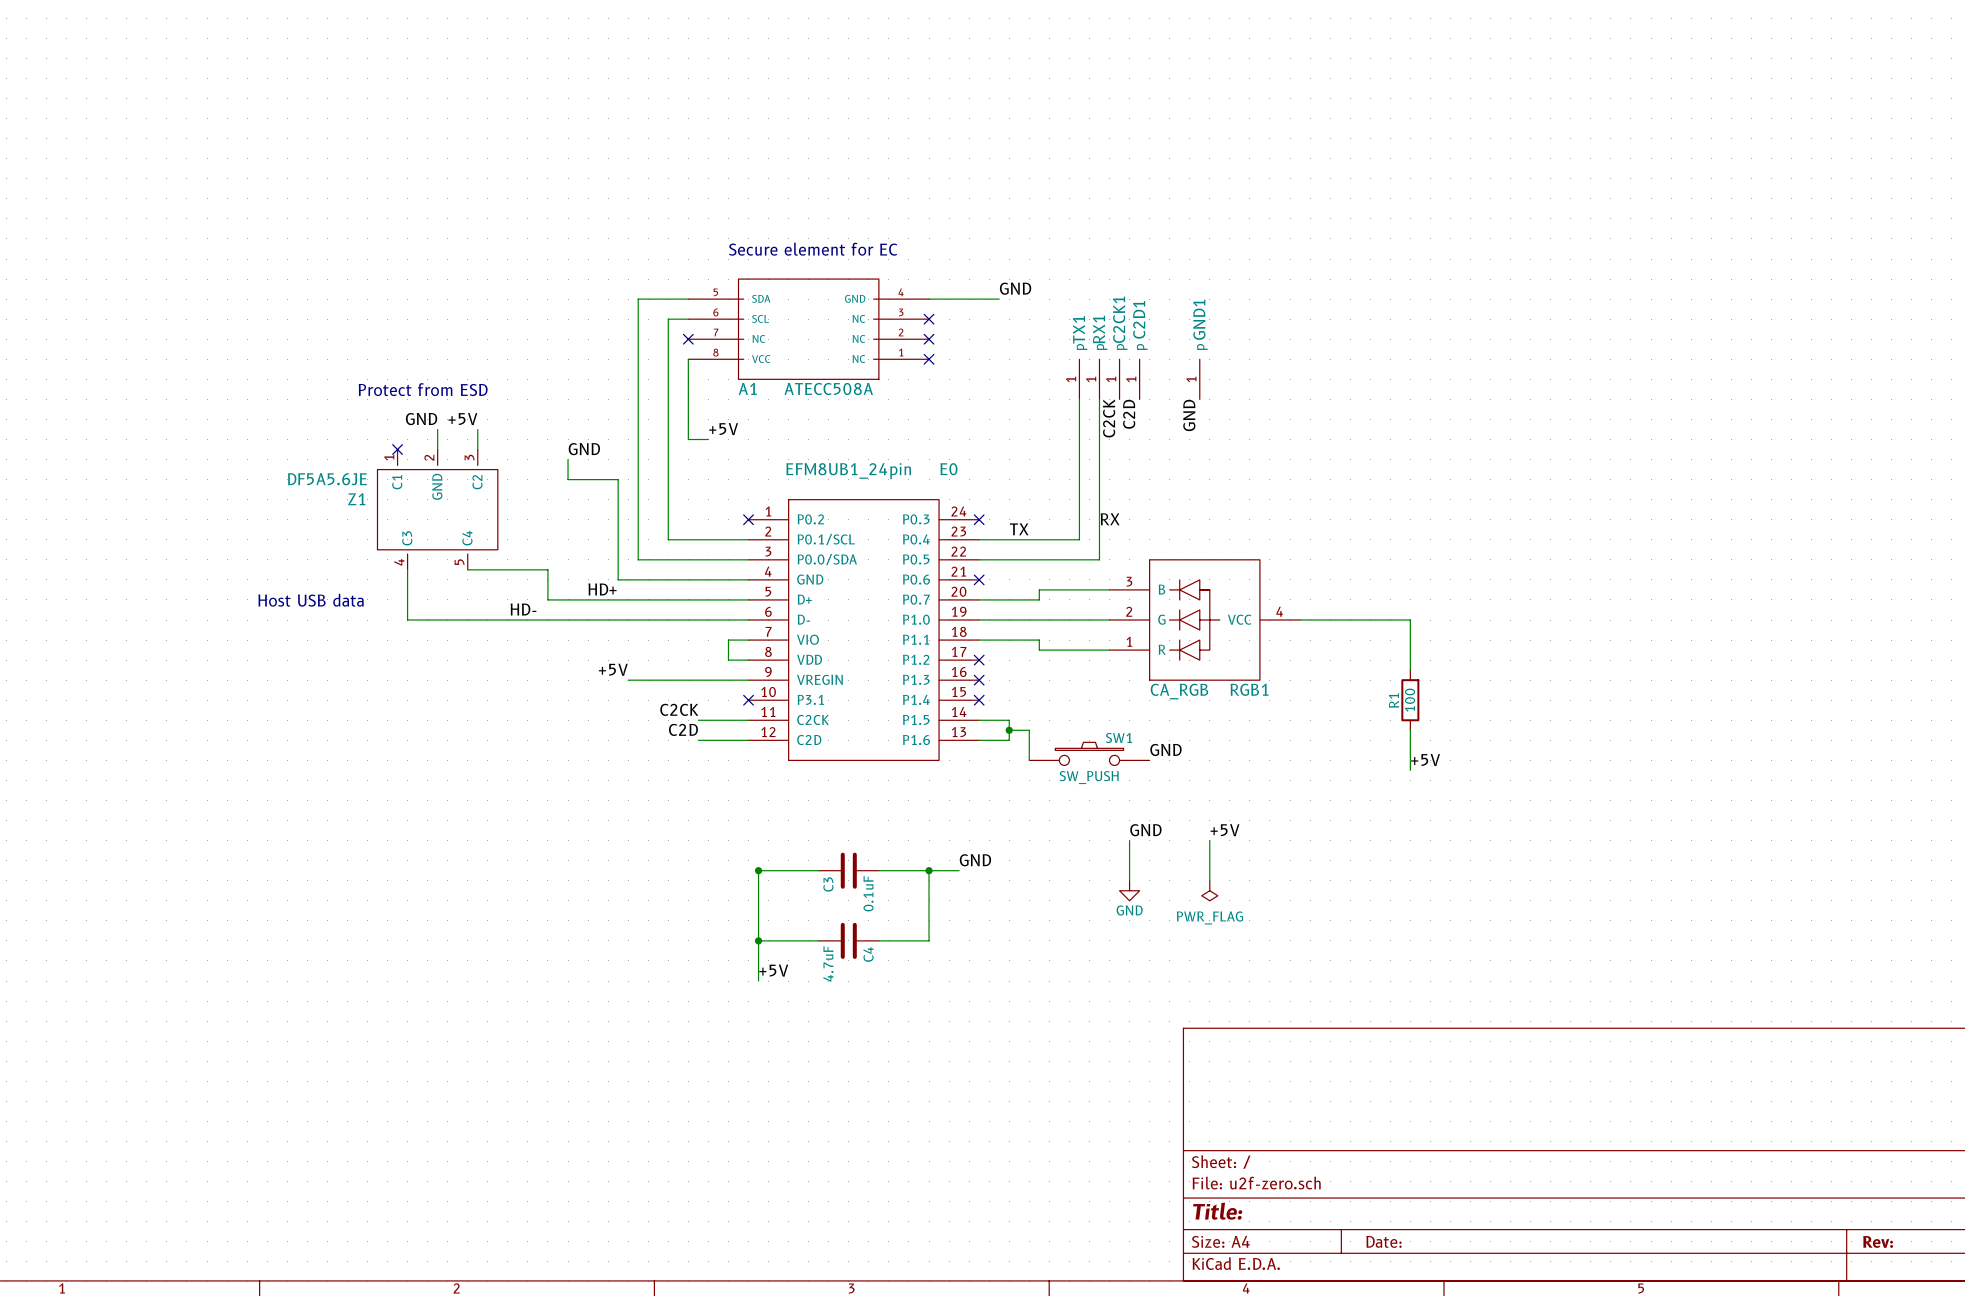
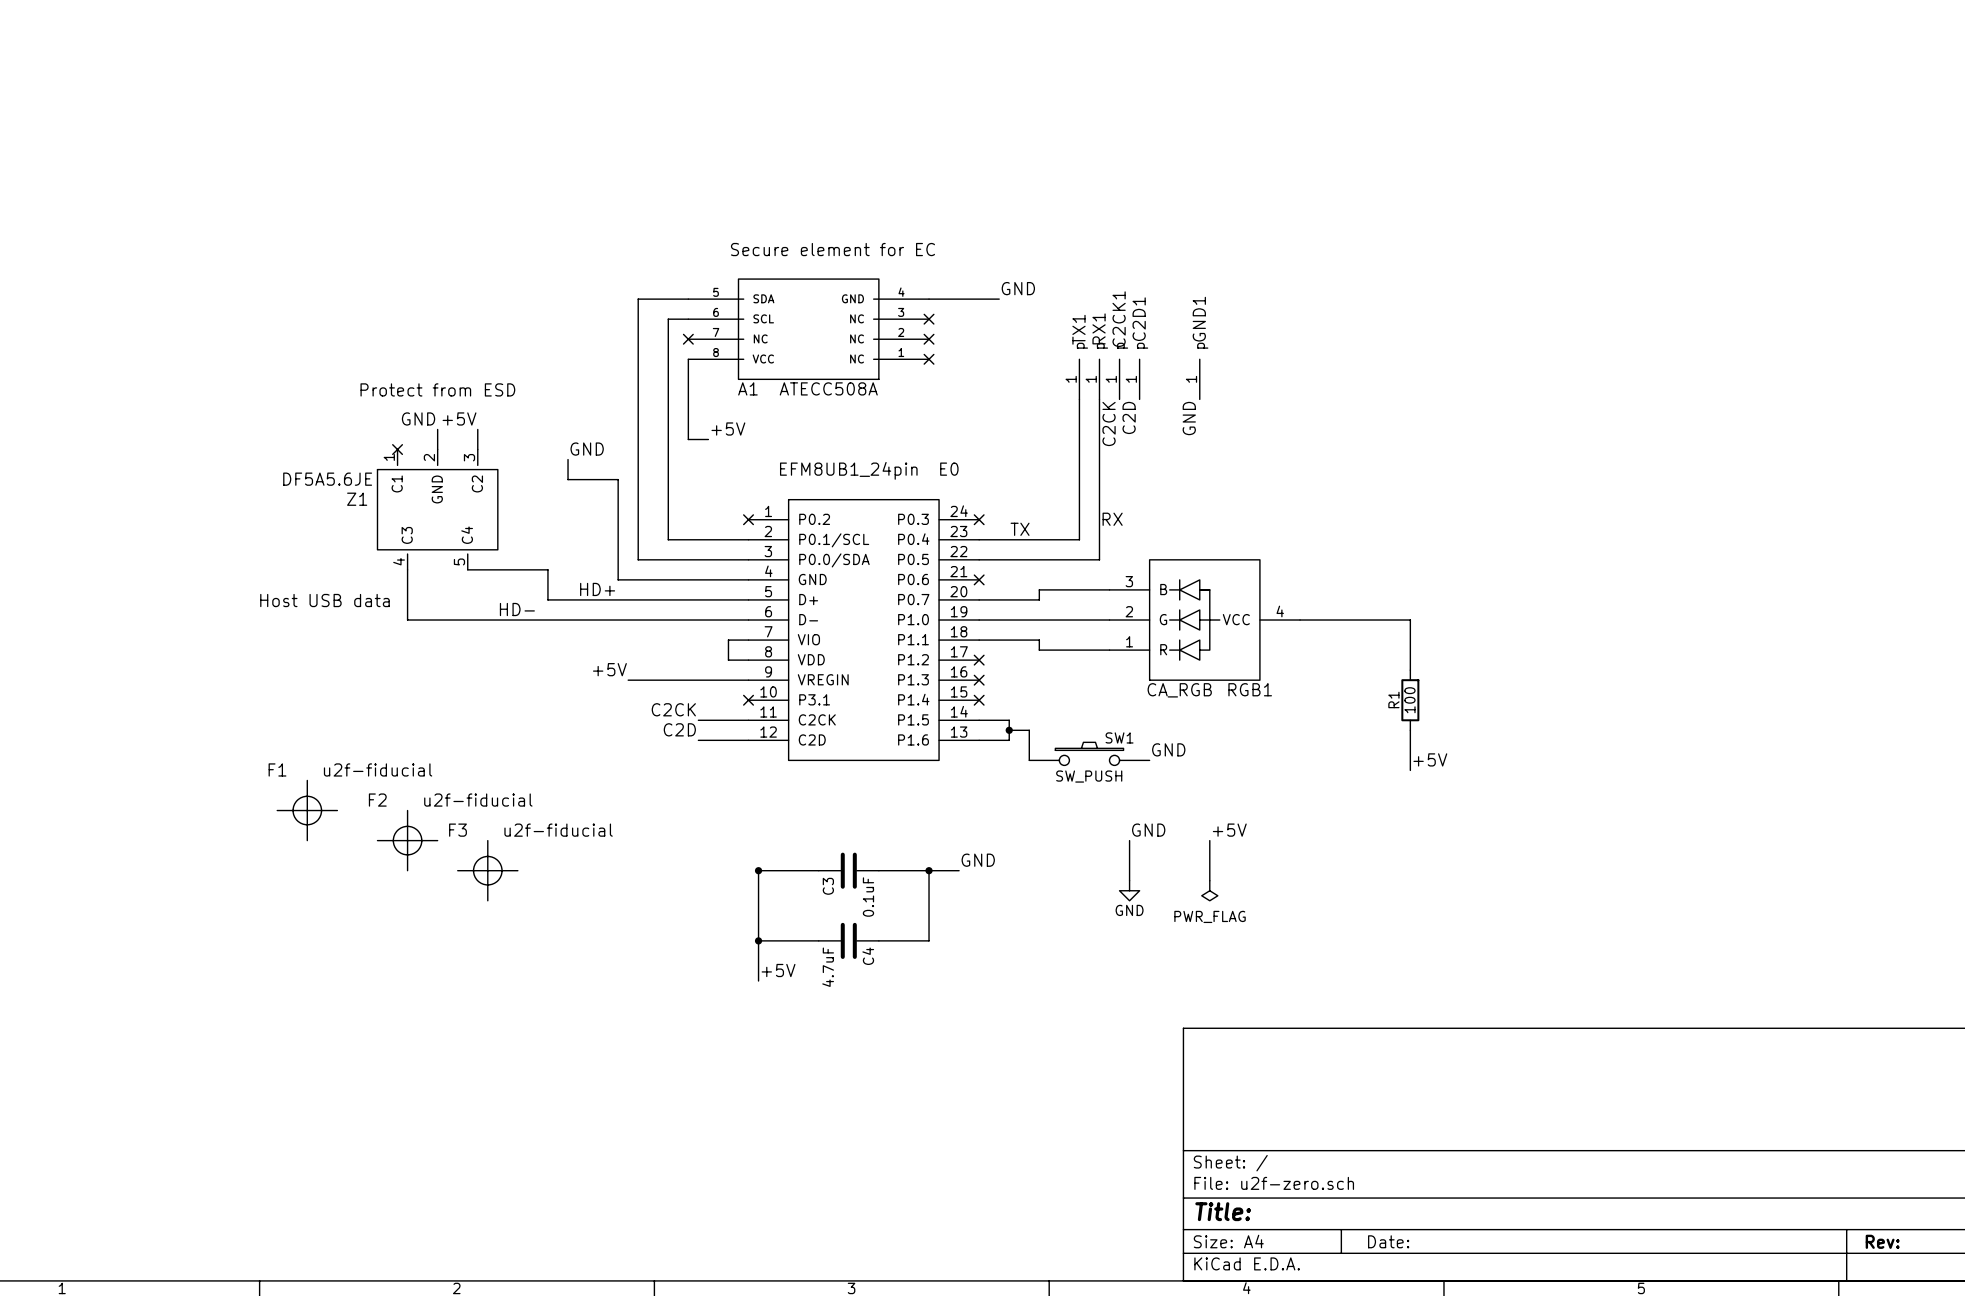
F1: none -> u2f-fiducial (307, 810)
F2: none -> u2f-fiducial (407, 840)
F3: none -> u2f-fiducial (487, 870)

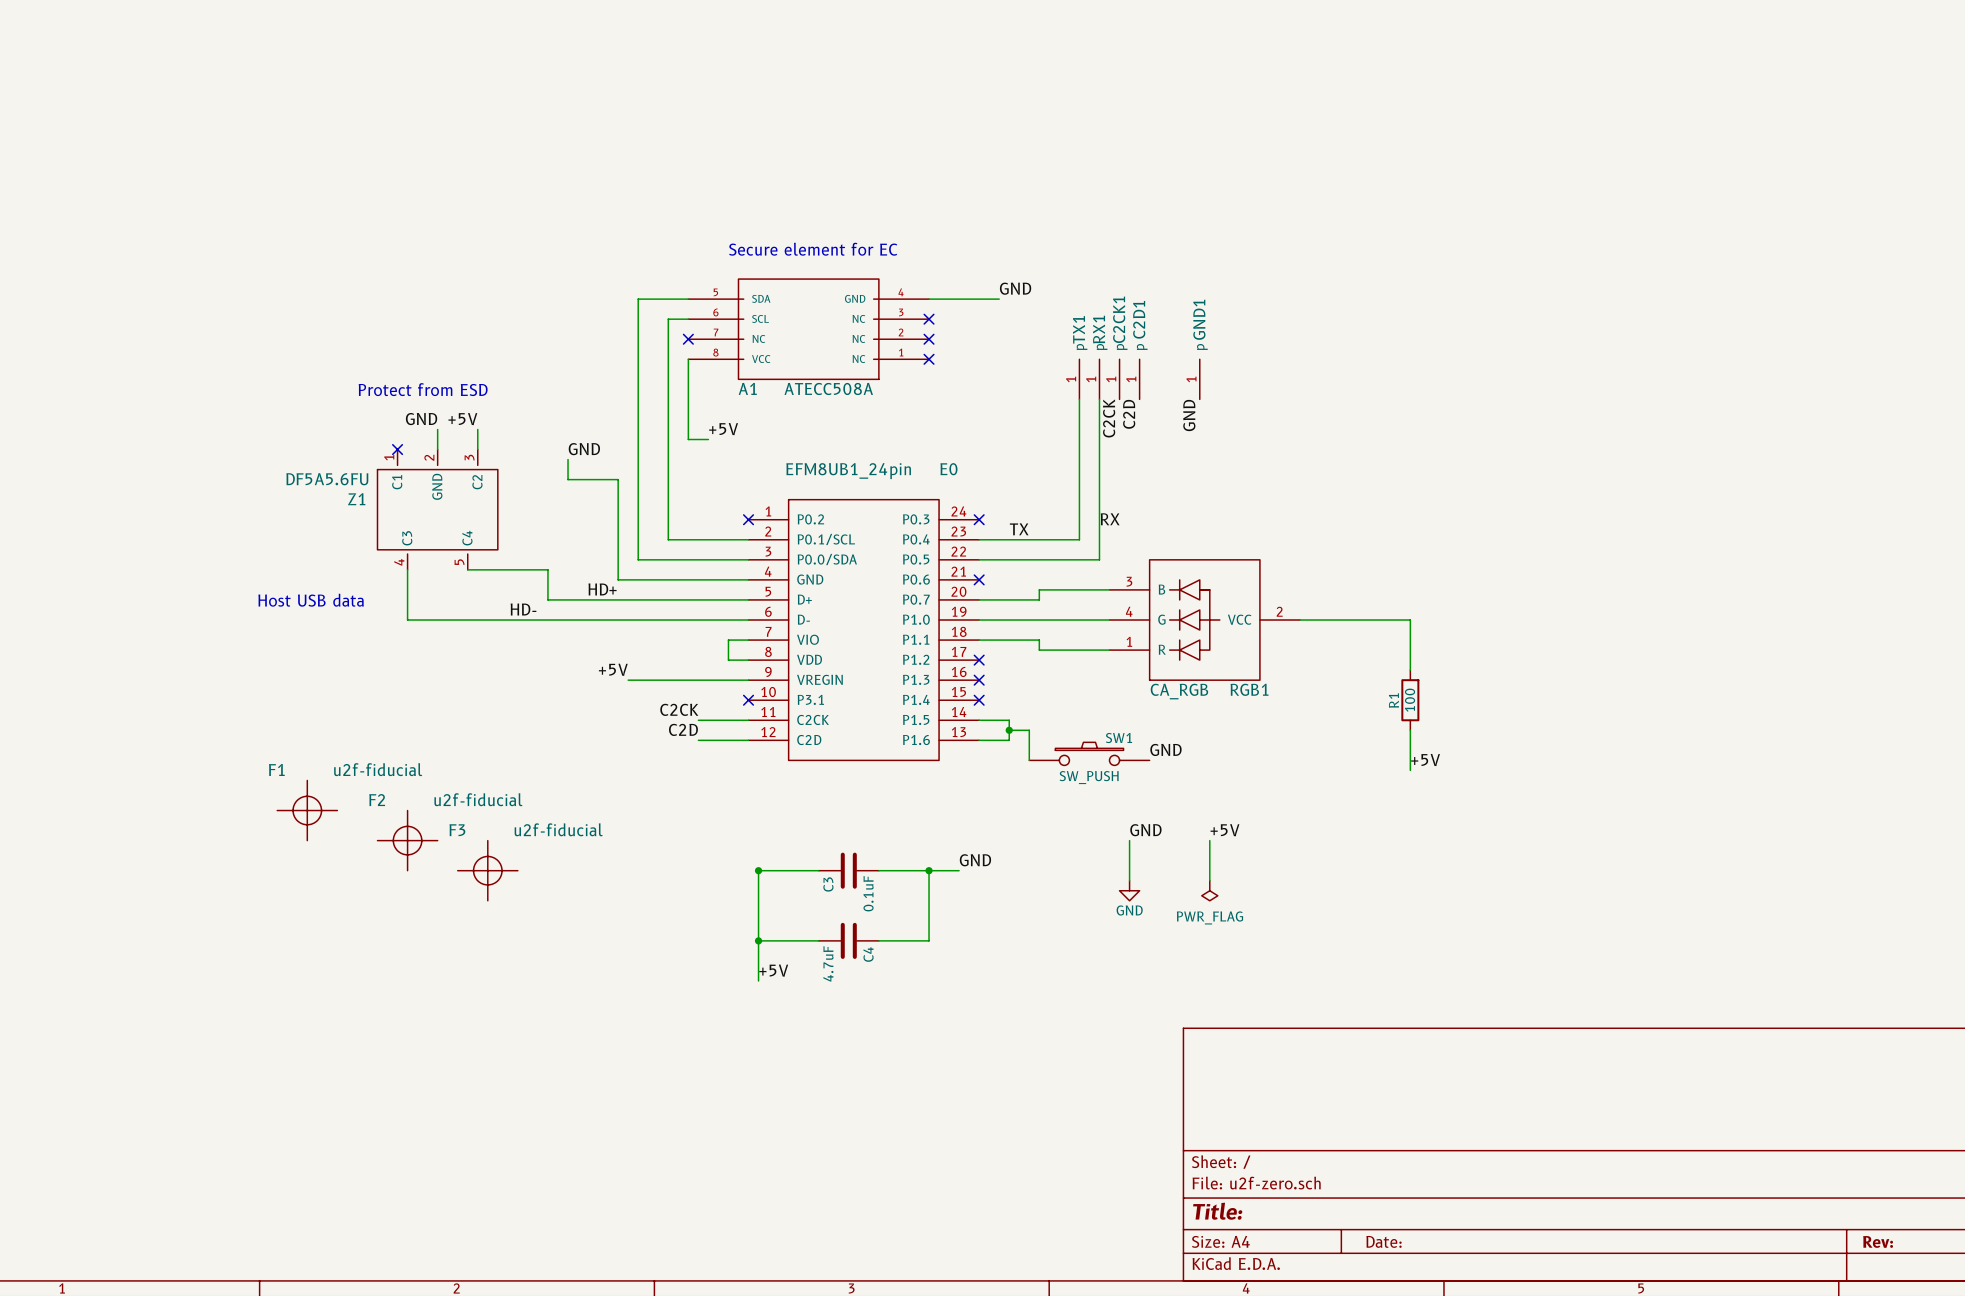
Z1 value: DF5A5.6JE (327, 479) -> DF5A5.6FU (327, 479)
RGB1 pin number: 2 (1129, 611) -> 4 (1129, 611)
RGB1 pin number: 4 (1280, 611) -> 2 (1279, 611)

